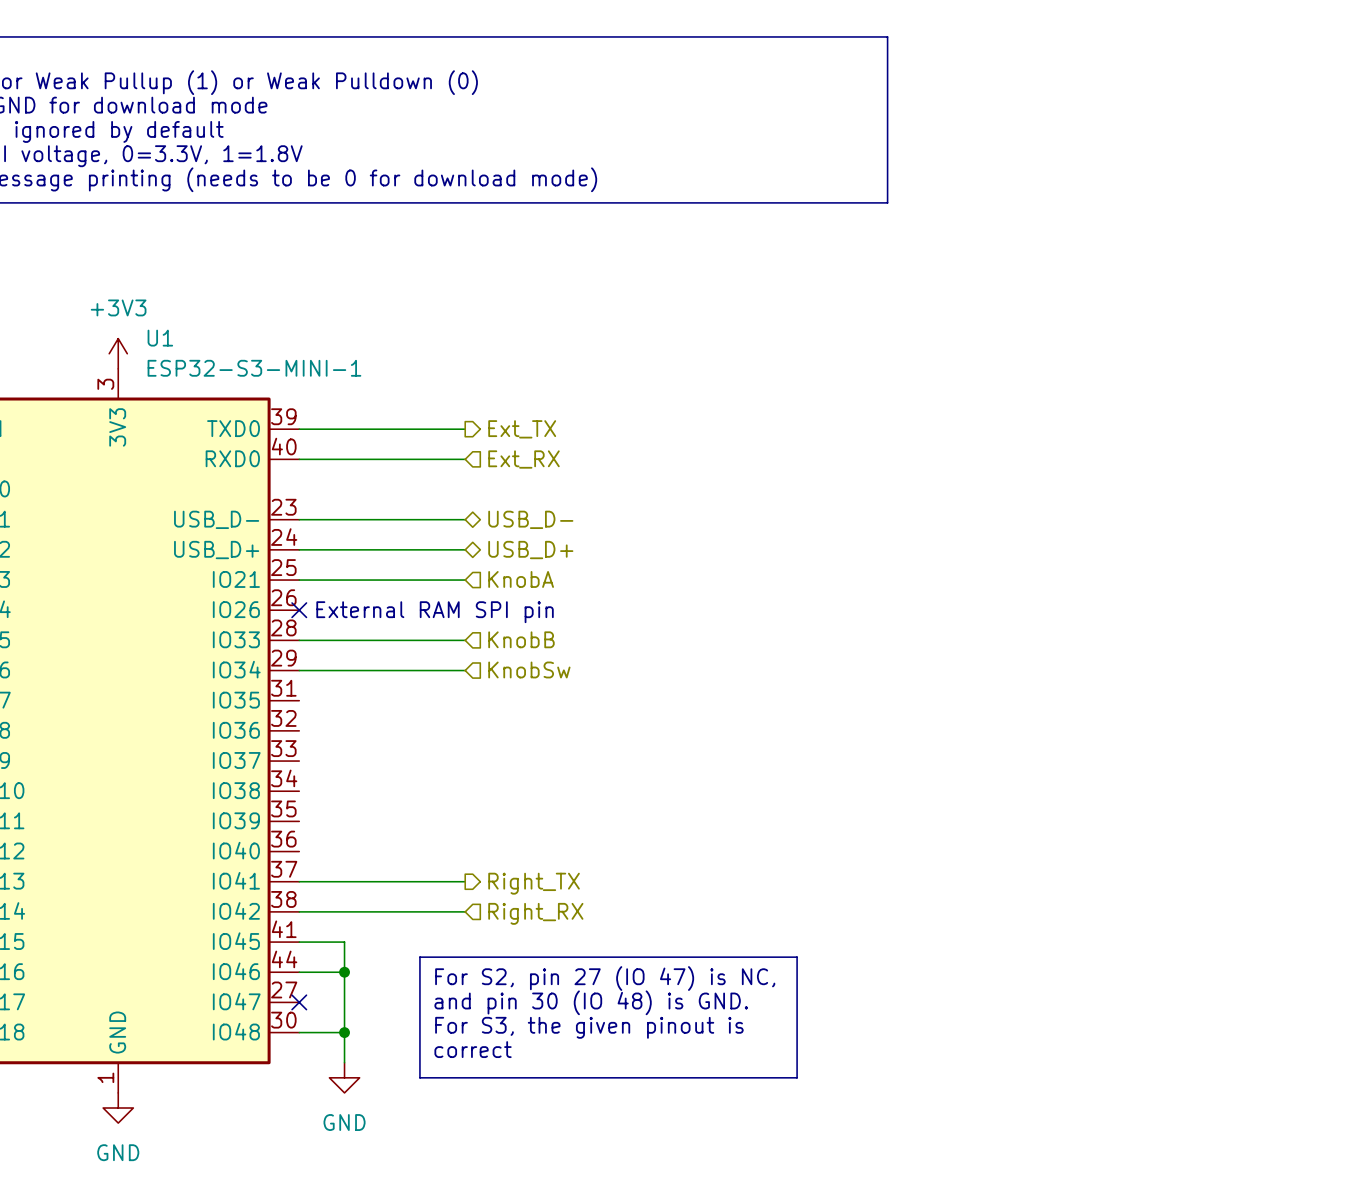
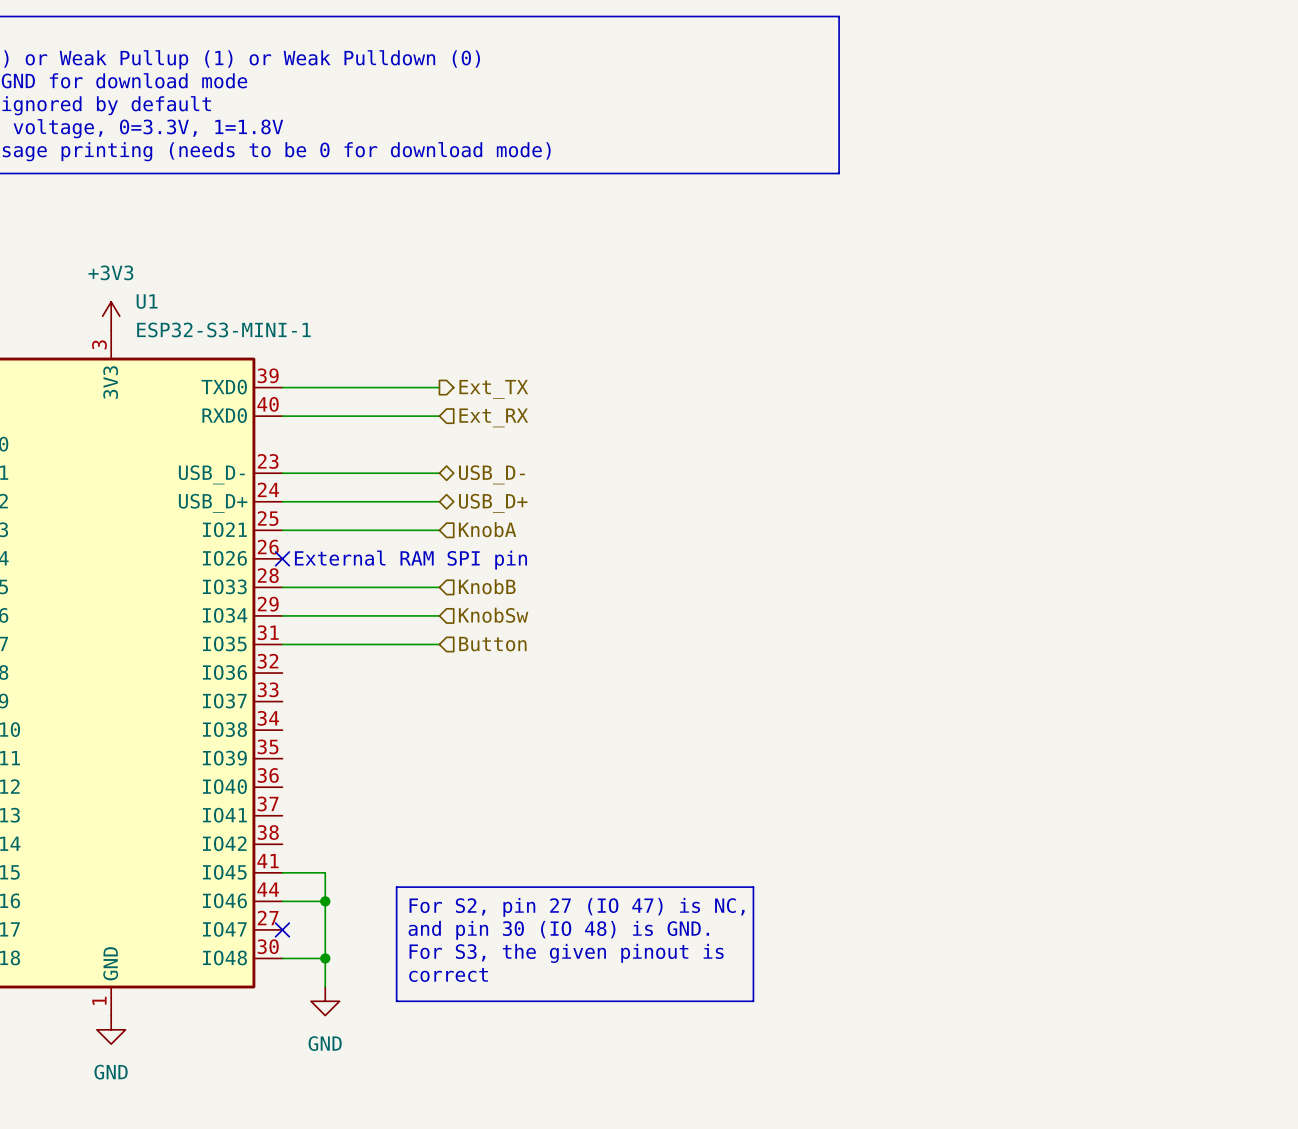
hierarchical label: none -> Button (492, 644)
wire: (299, 881) (465, 881) -> (282, 644) (439, 644)
hierarchical label: Right_TX (534, 883) -> none
wire: (299, 911) (465, 911) -> none
hierarchical label: Right_RX (535, 913) -> none

